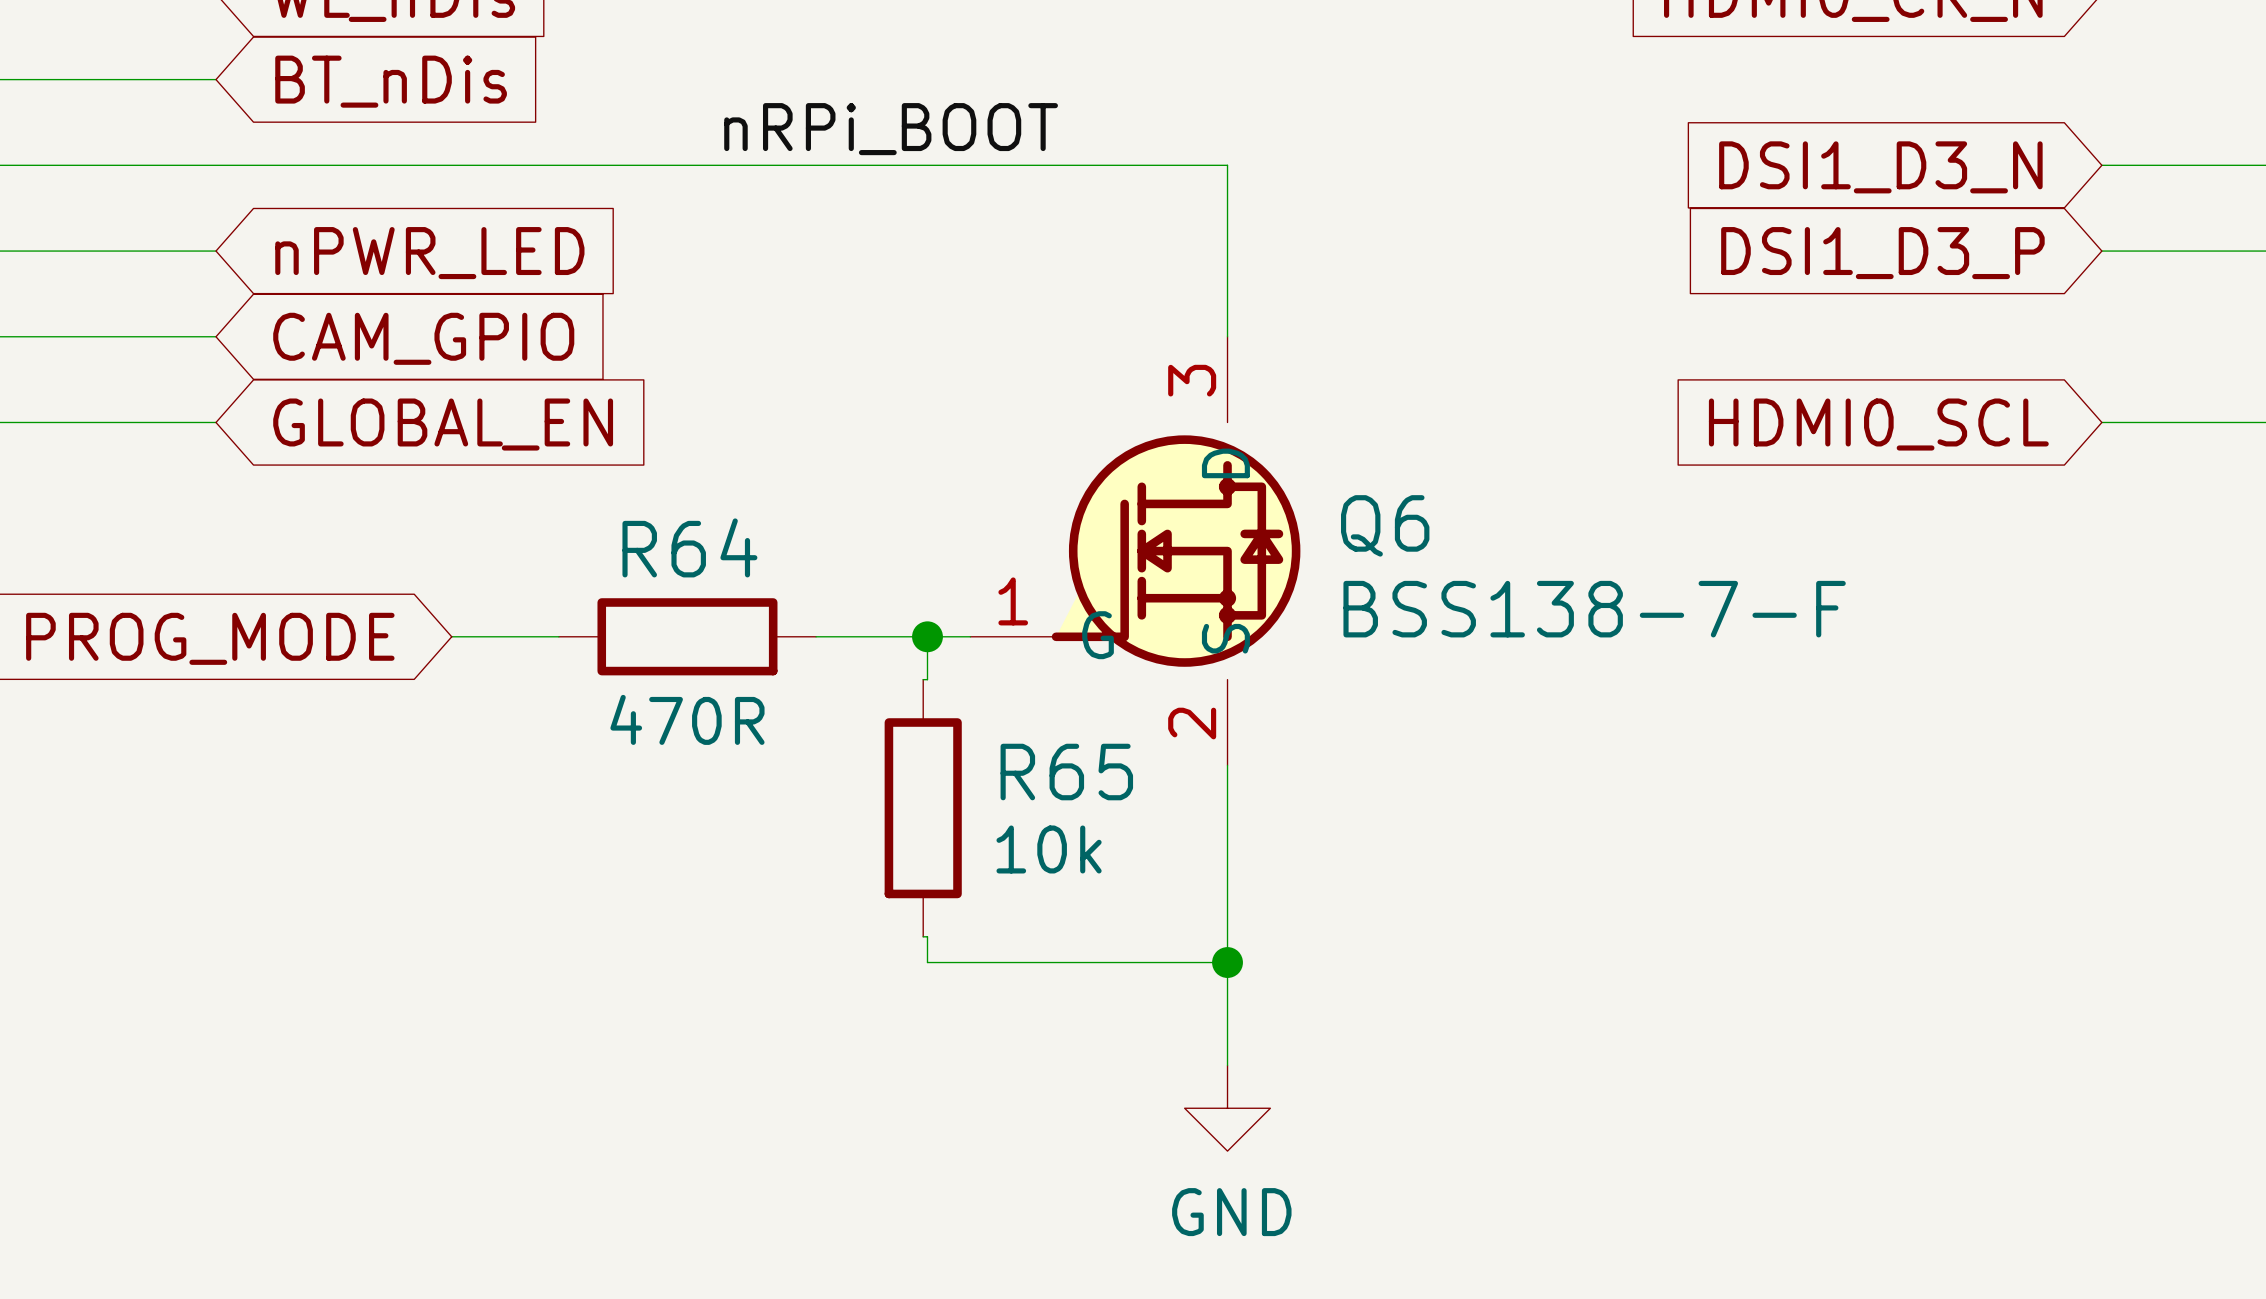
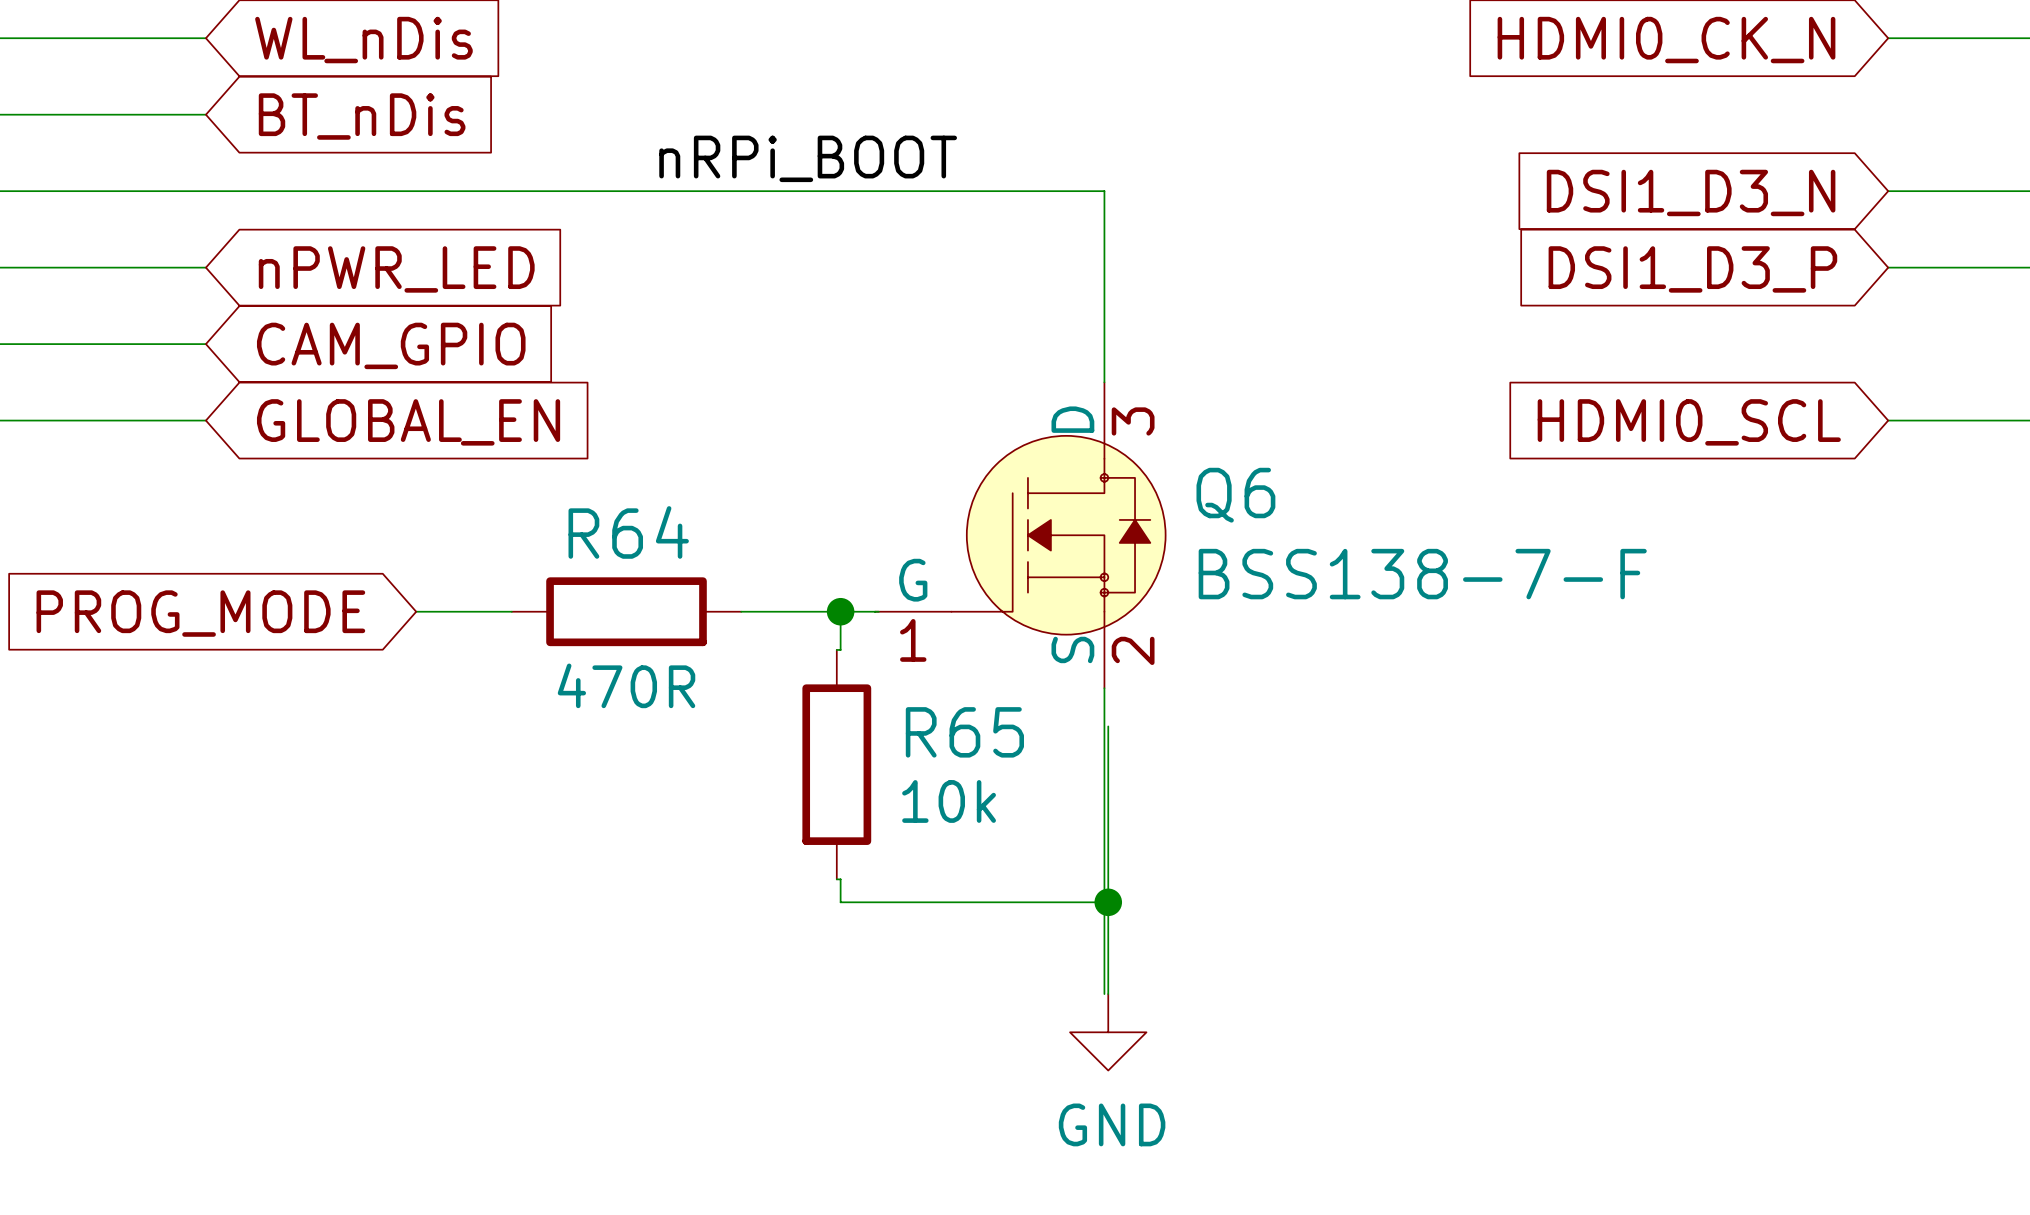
wire: (1223, 165) (1227, 165) (1227, 336) -> (1104, 191) (1104, 382)
Q6 symbol: [970, 336, 1301, 766] -> [875, 382, 1166, 689]
wire: none -> (1104, 688) (1104, 994)

